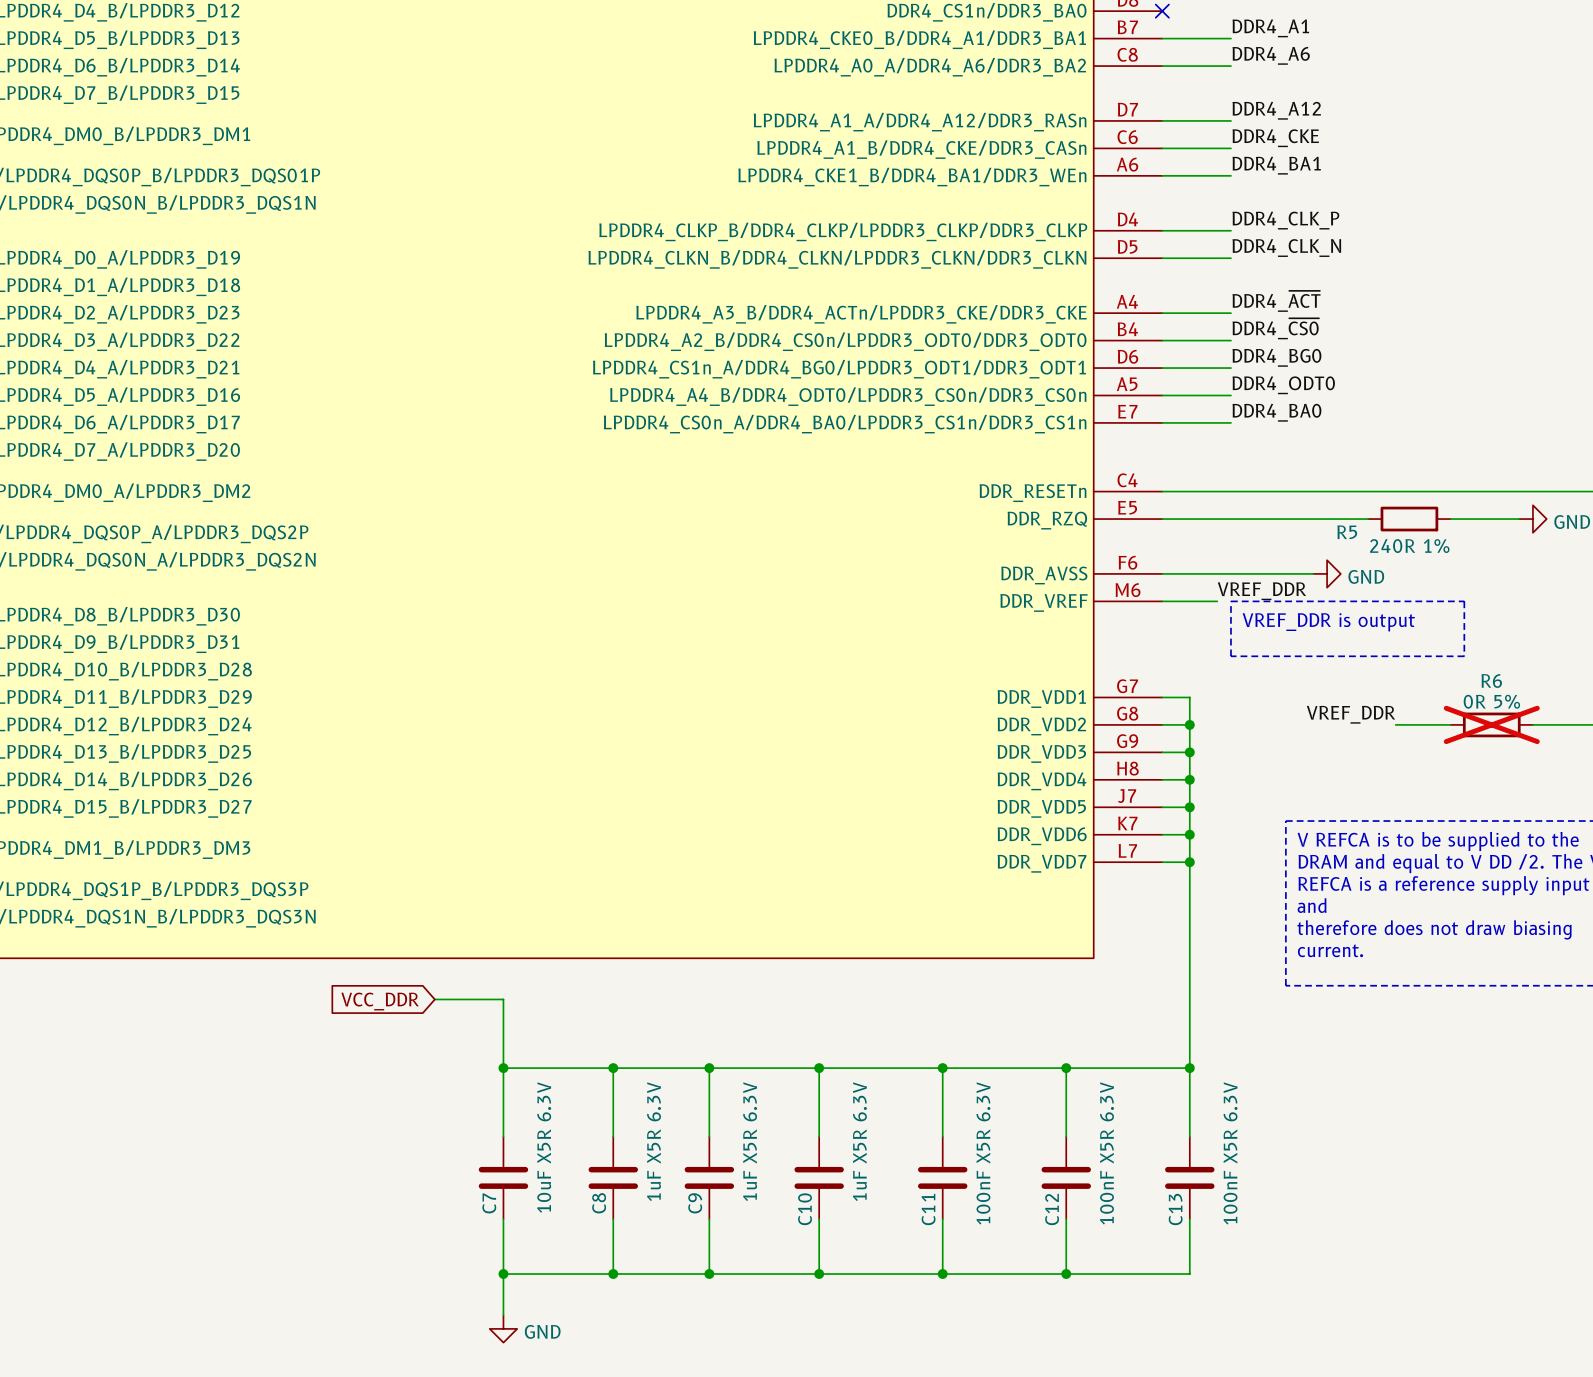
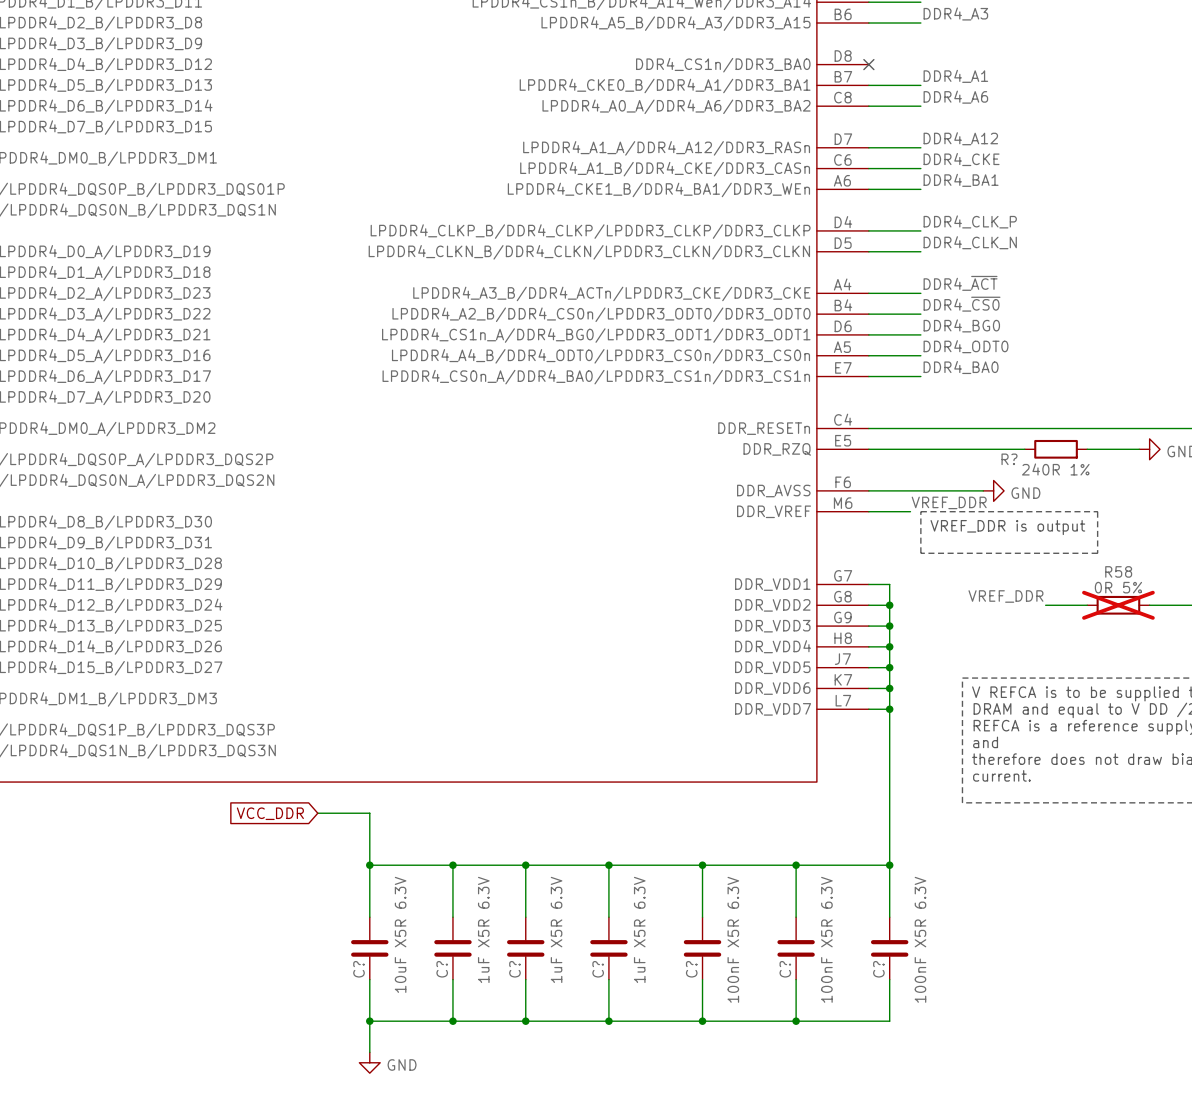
R5 name: R5 (1347, 532) -> R? (1009, 459)
R6 name: R6 (1491, 680) -> R58 (1118, 571)
C7 name: C7 (489, 1203) -> C? (359, 969)
C8 name: C8 (599, 1203) -> C? (442, 969)
C9 name: C9 (695, 1203) -> C? (514, 969)
C10 name: C10 (805, 1209) -> C? (598, 969)
C11 name: C11 (928, 1209) -> C? (691, 969)
C12 name: C12 (1052, 1209) -> C? (785, 969)
C13 name: C13 (1175, 1209) -> C? (878, 969)

